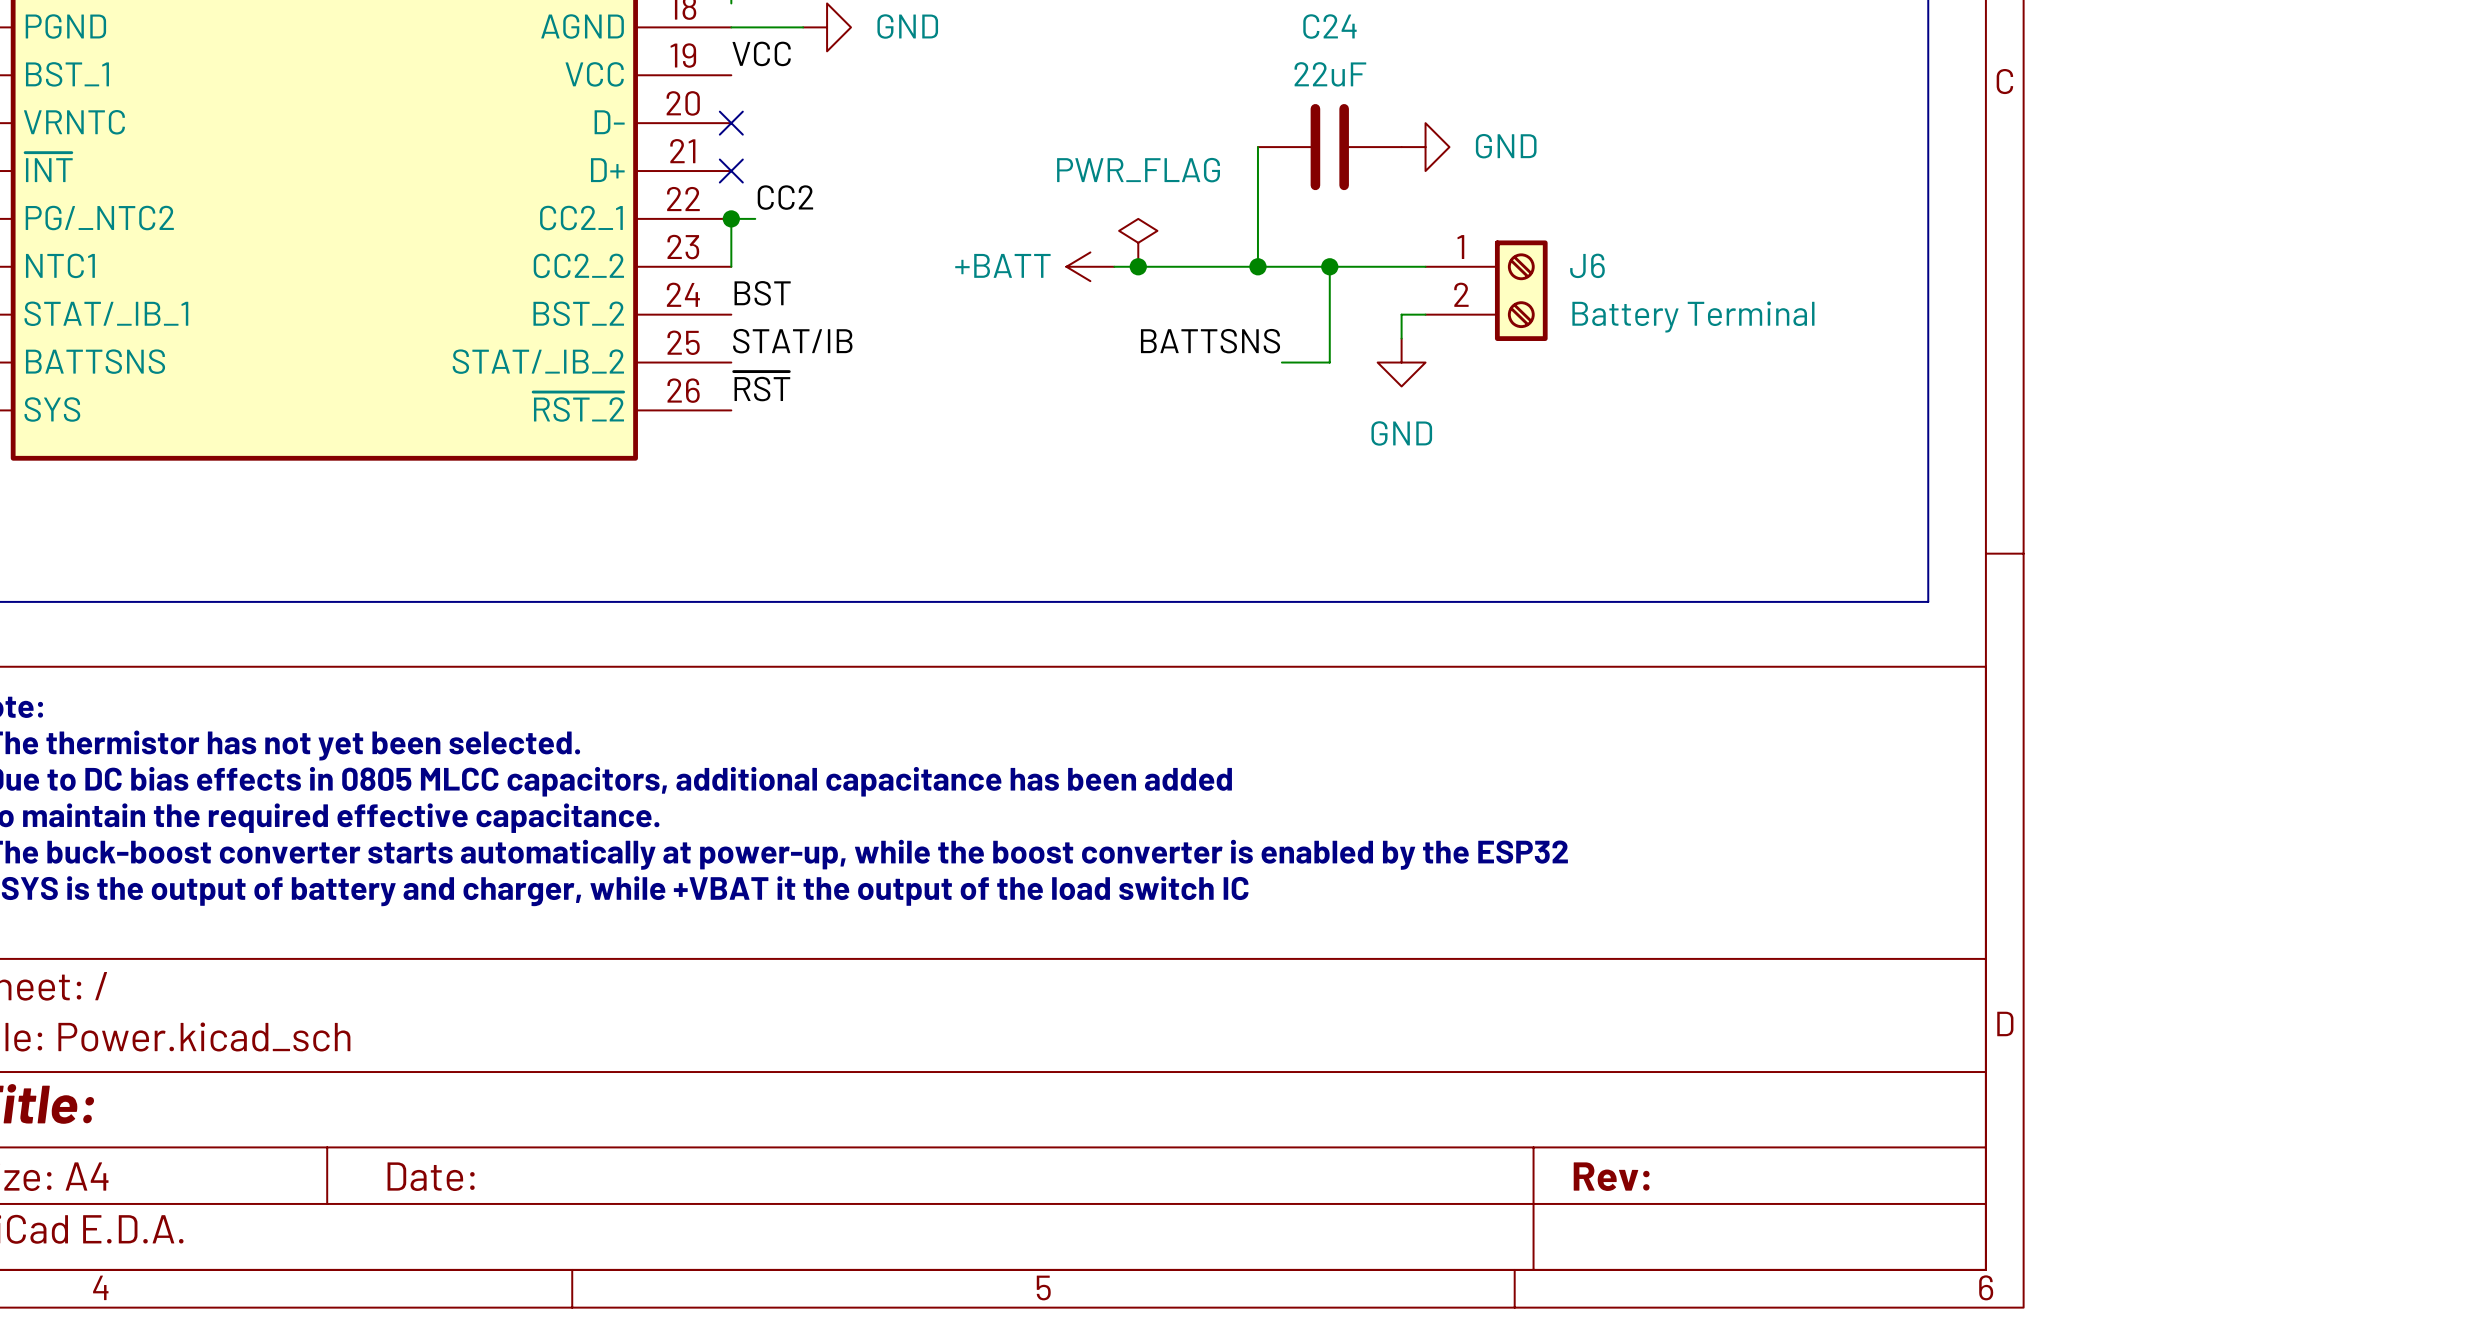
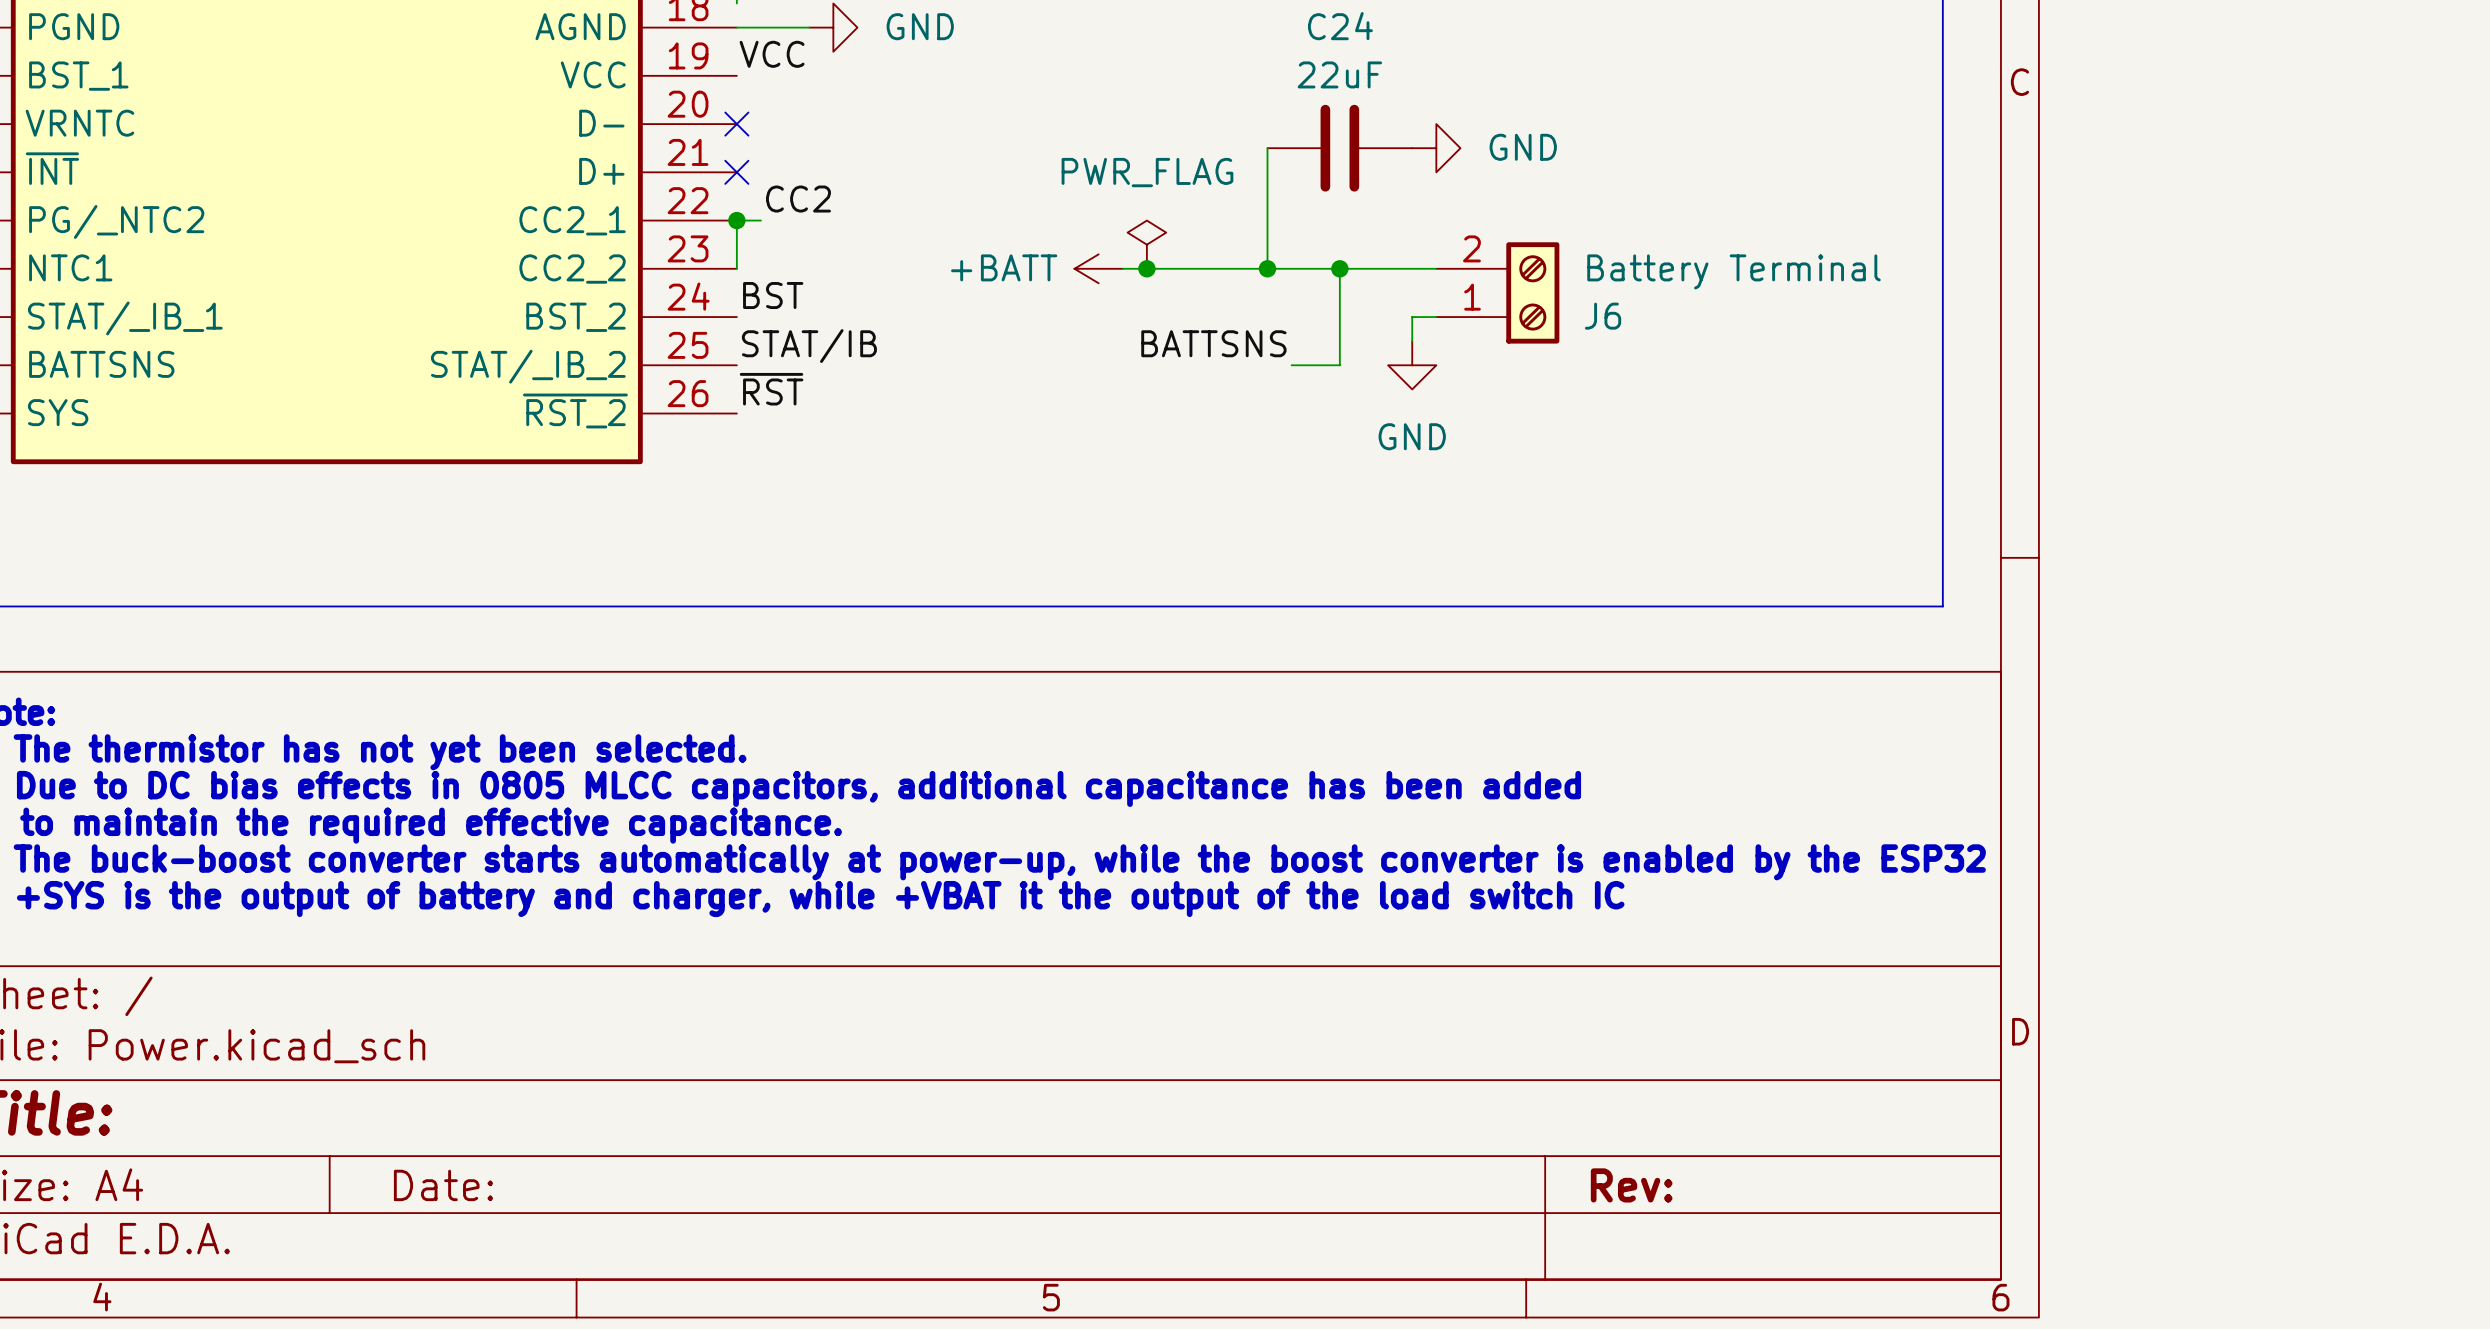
J6 flip: as is (1521, 290) -> up-down (1532, 292)

